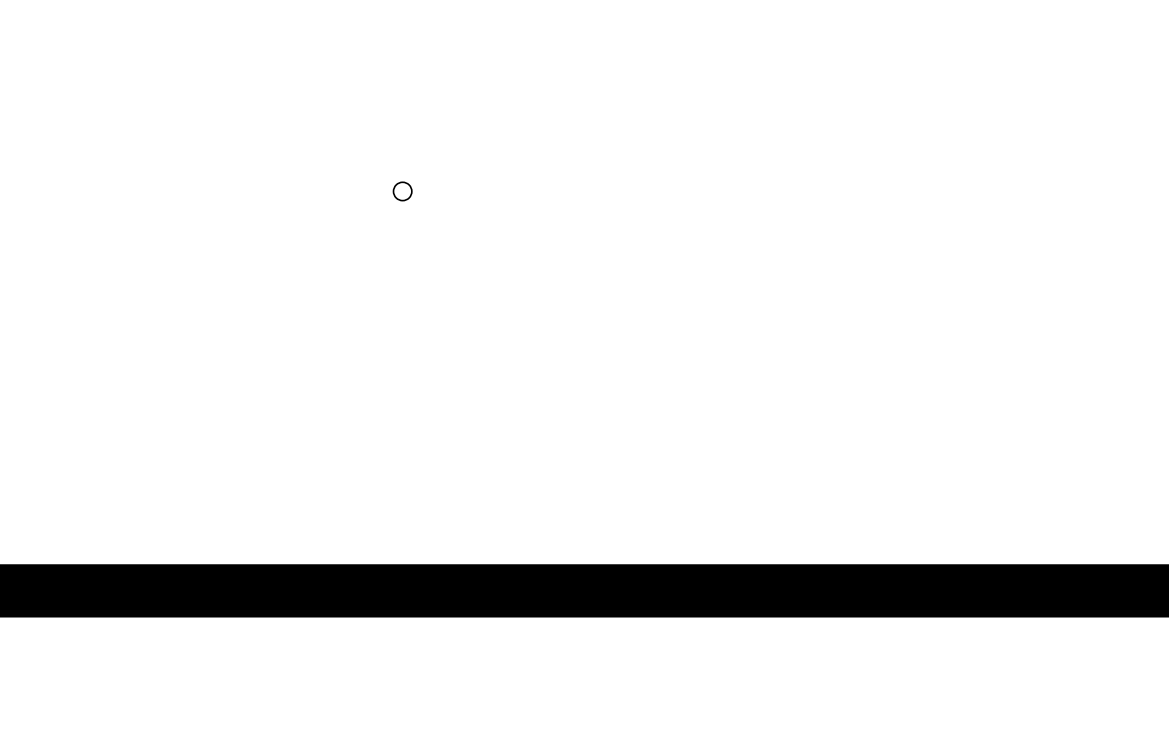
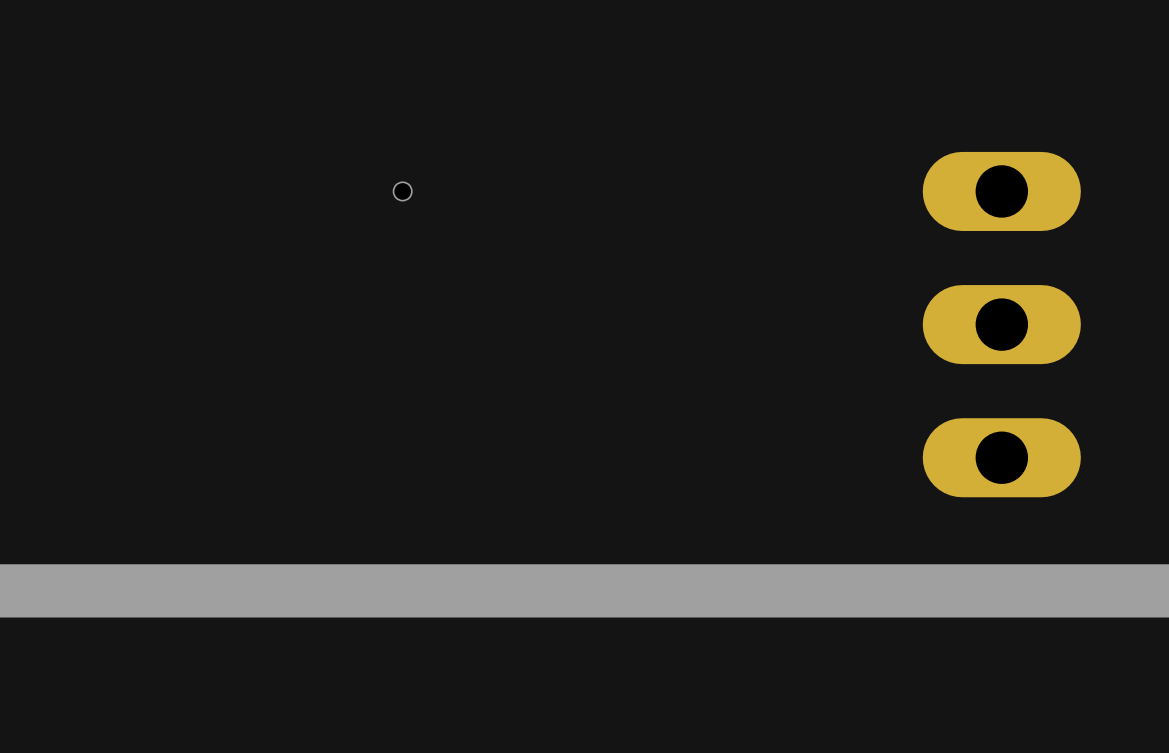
part: none -> (1001, 324)

